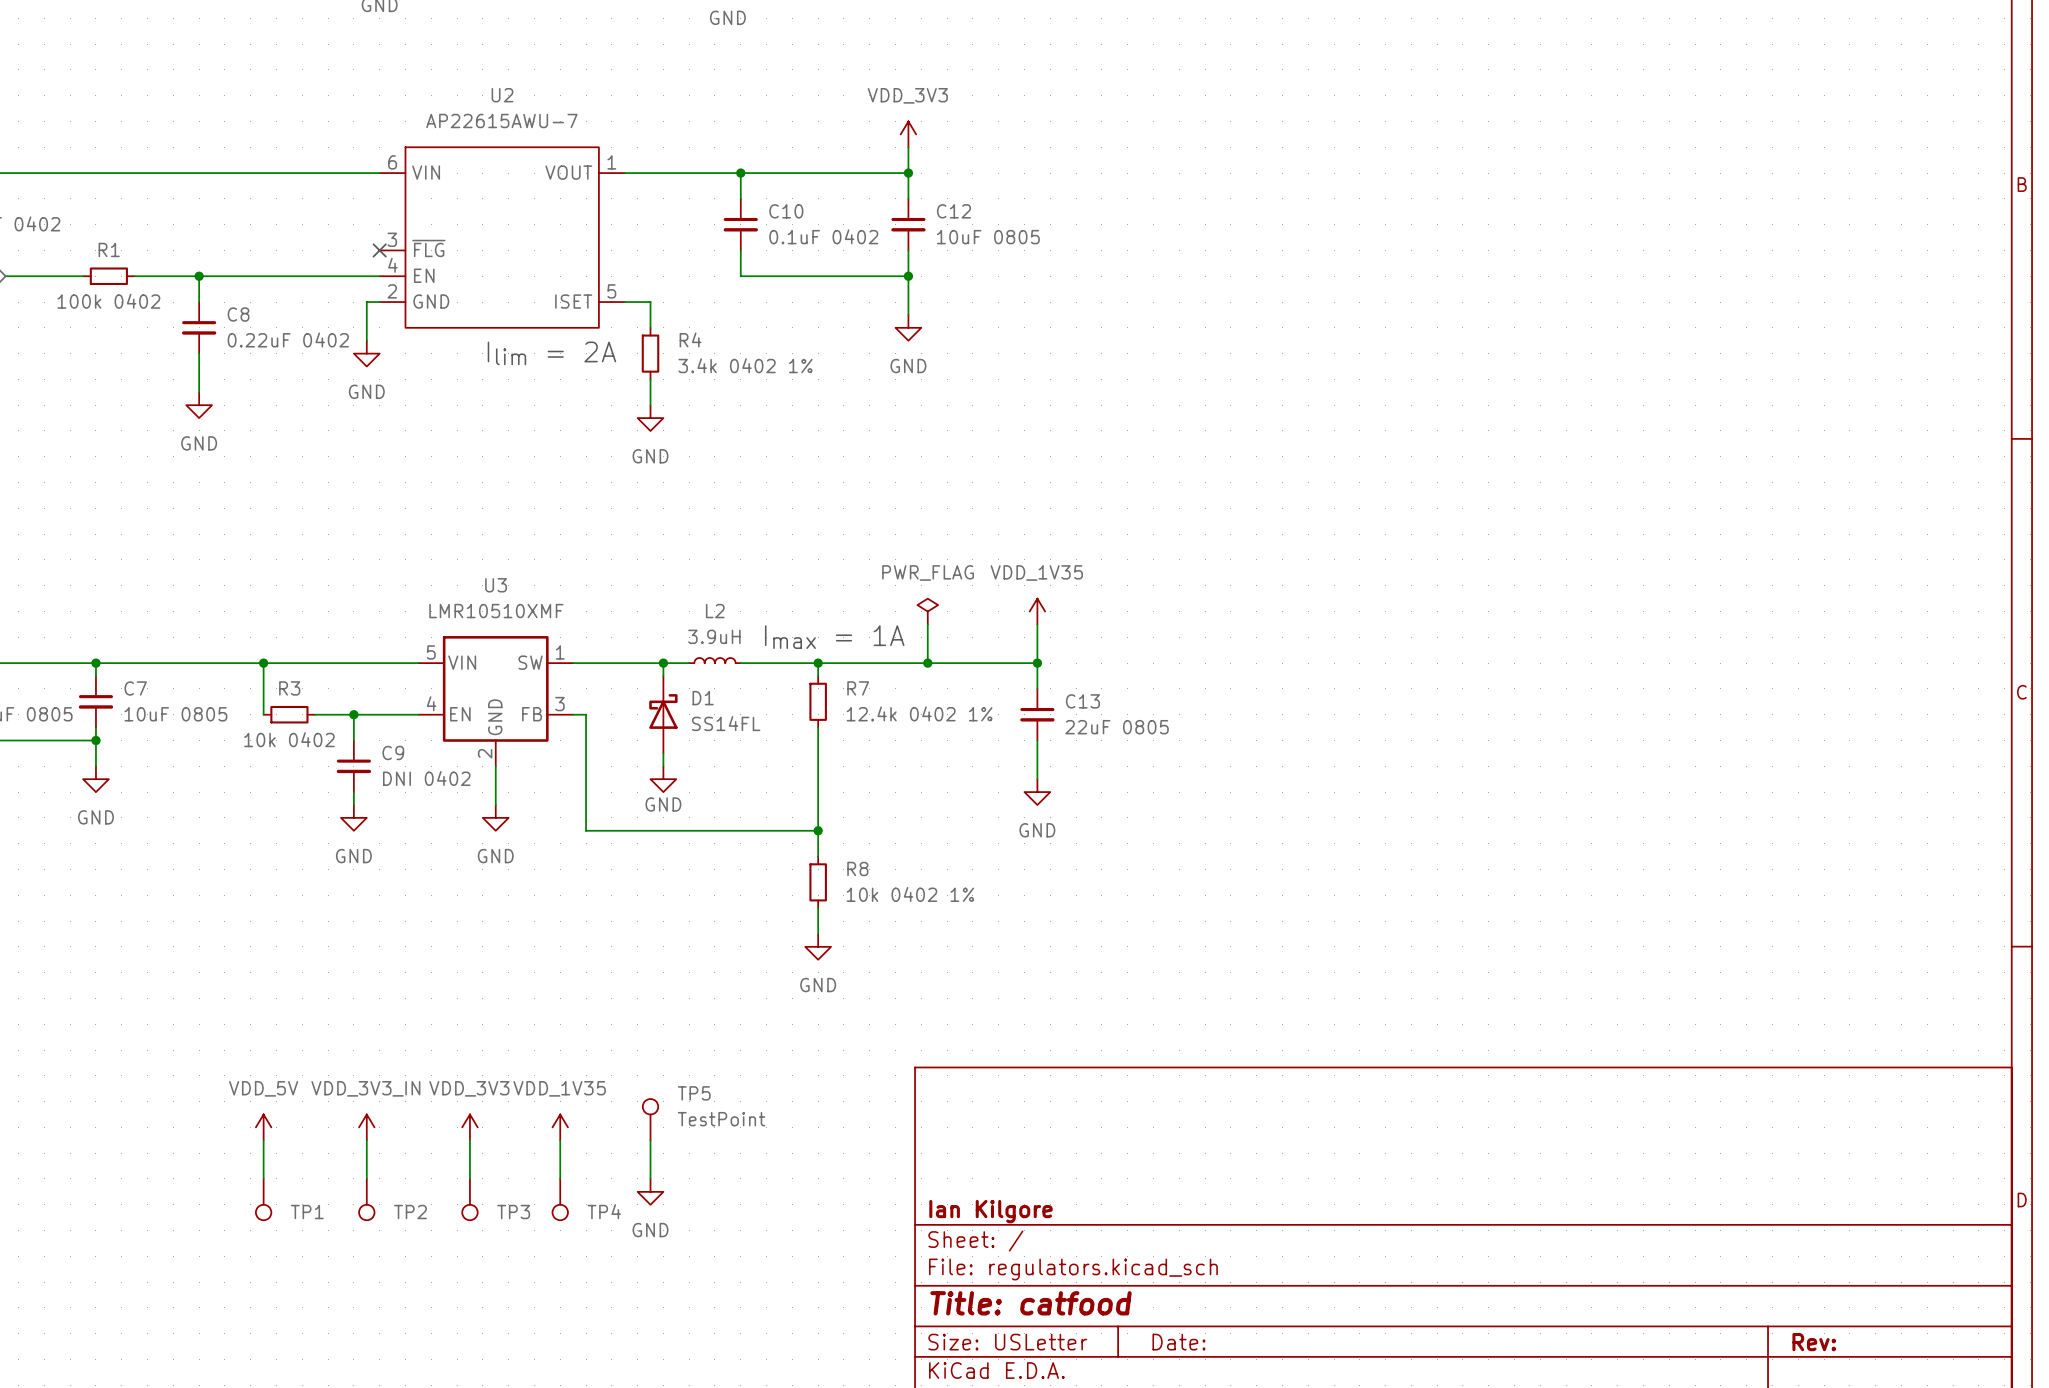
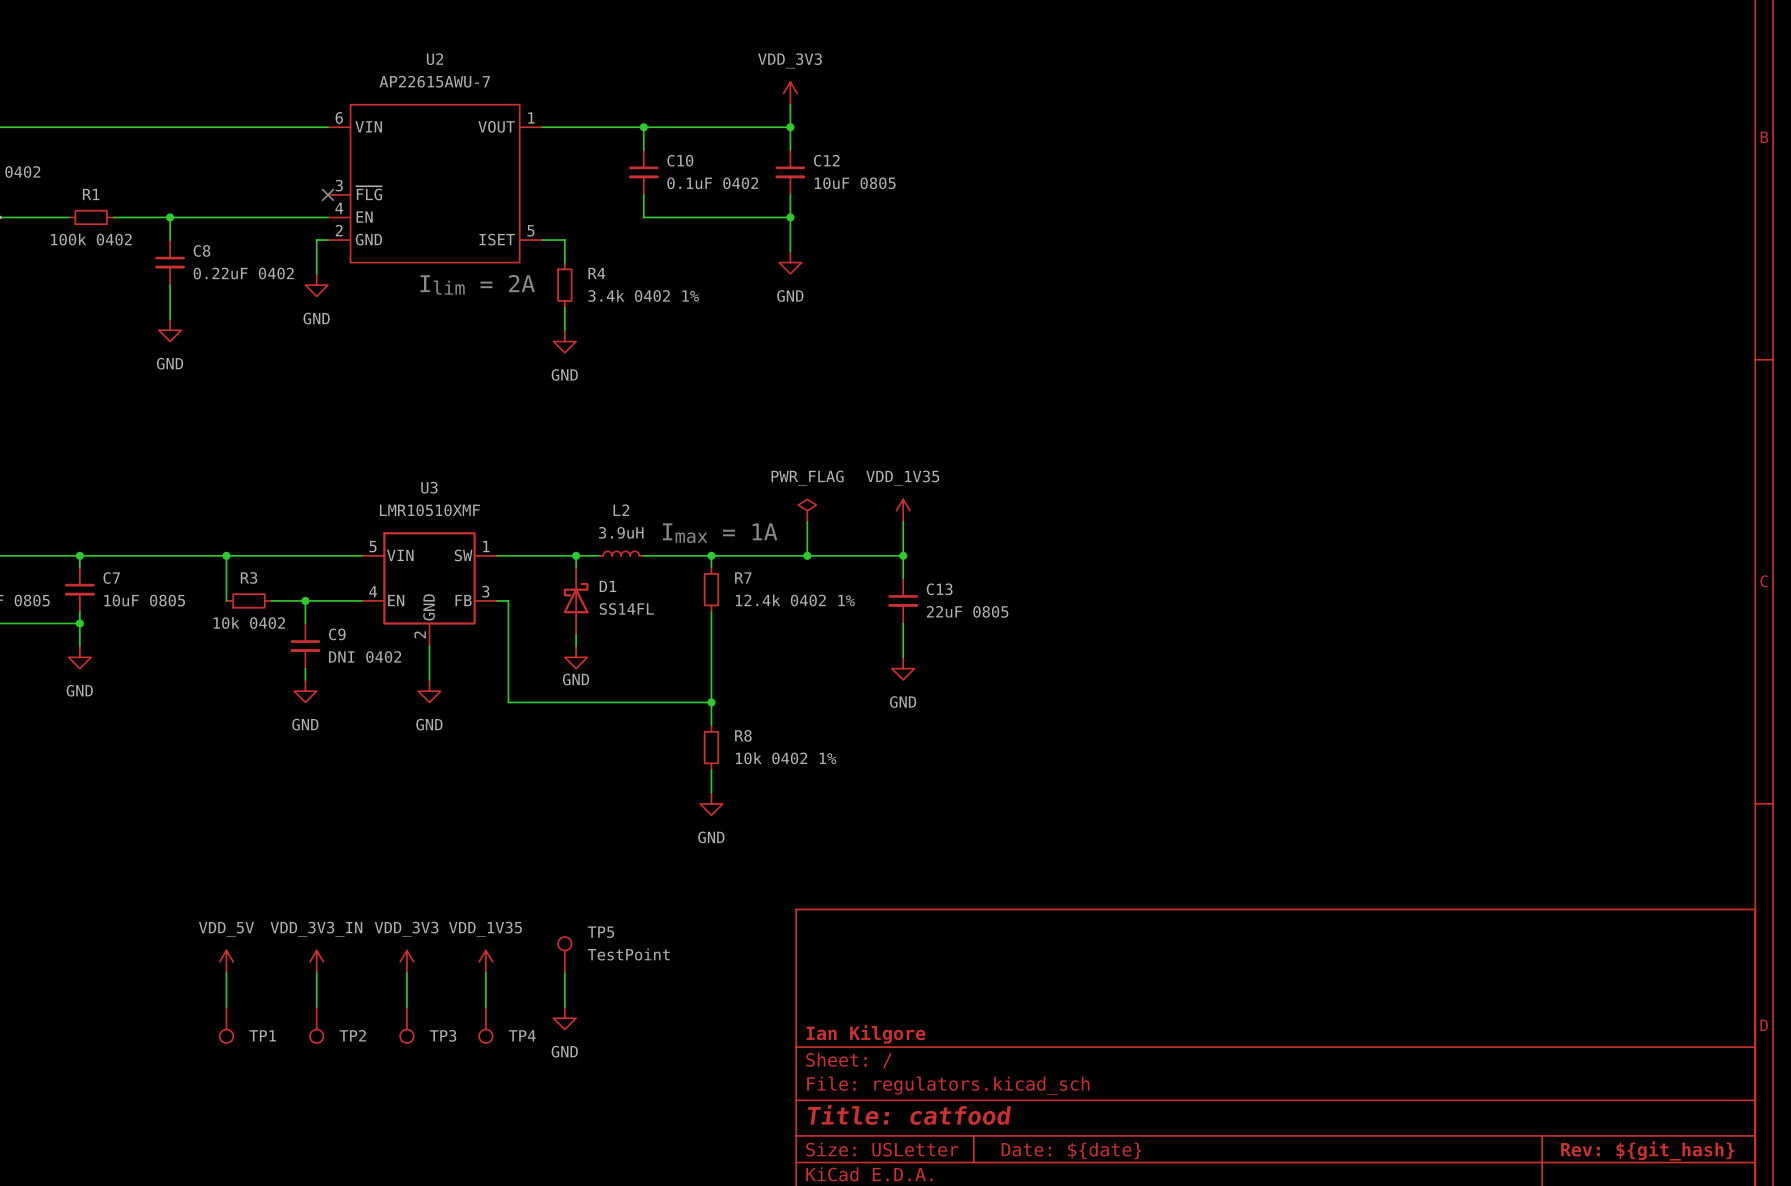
title block: Date: (1178, 1342) -> Date: ${date} (1071, 1150)
title block: Rev: (1814, 1342) -> Rev: ${git_hash} (1647, 1151)

